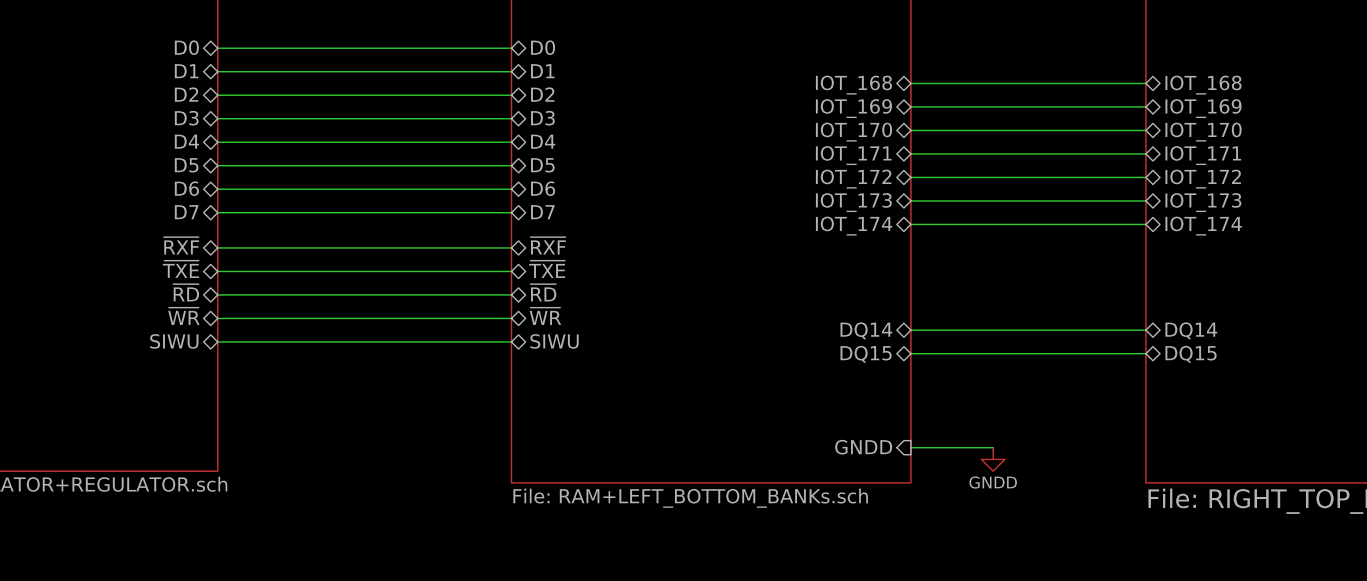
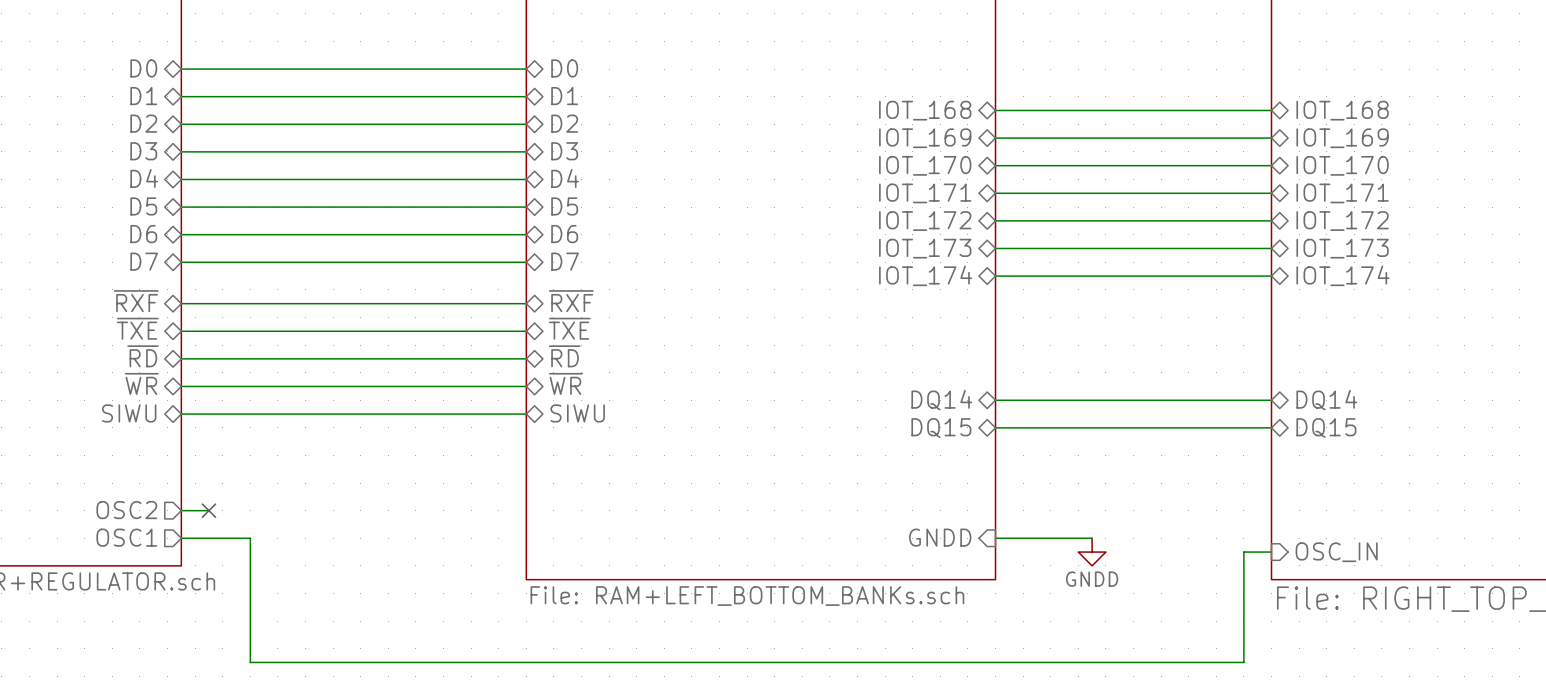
sheet pin: none -> OSC2 (126, 510)
wire: none -> (181, 510) (208, 510)
no-connect mark: none -> (208, 510)
sheet pin: none -> OSC1 (126, 537)
wire: none -> (181, 538) (250, 538) (250, 662) (1243, 662) (1243, 552) (1271, 552)
sheet pin: none -> OSC_IN (1336, 552)

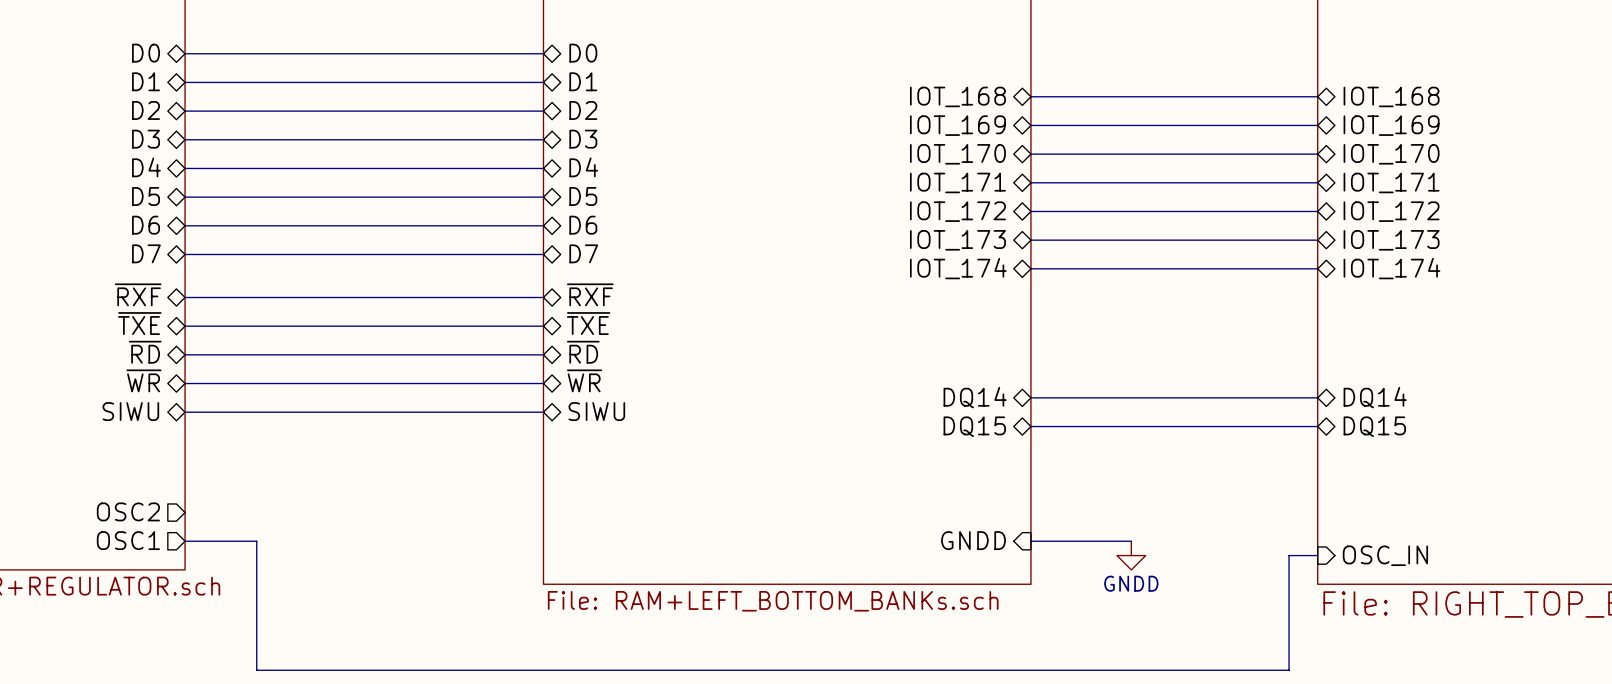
wire: (181, 510) (208, 510) -> none
no-connect mark: (208, 510) -> none

